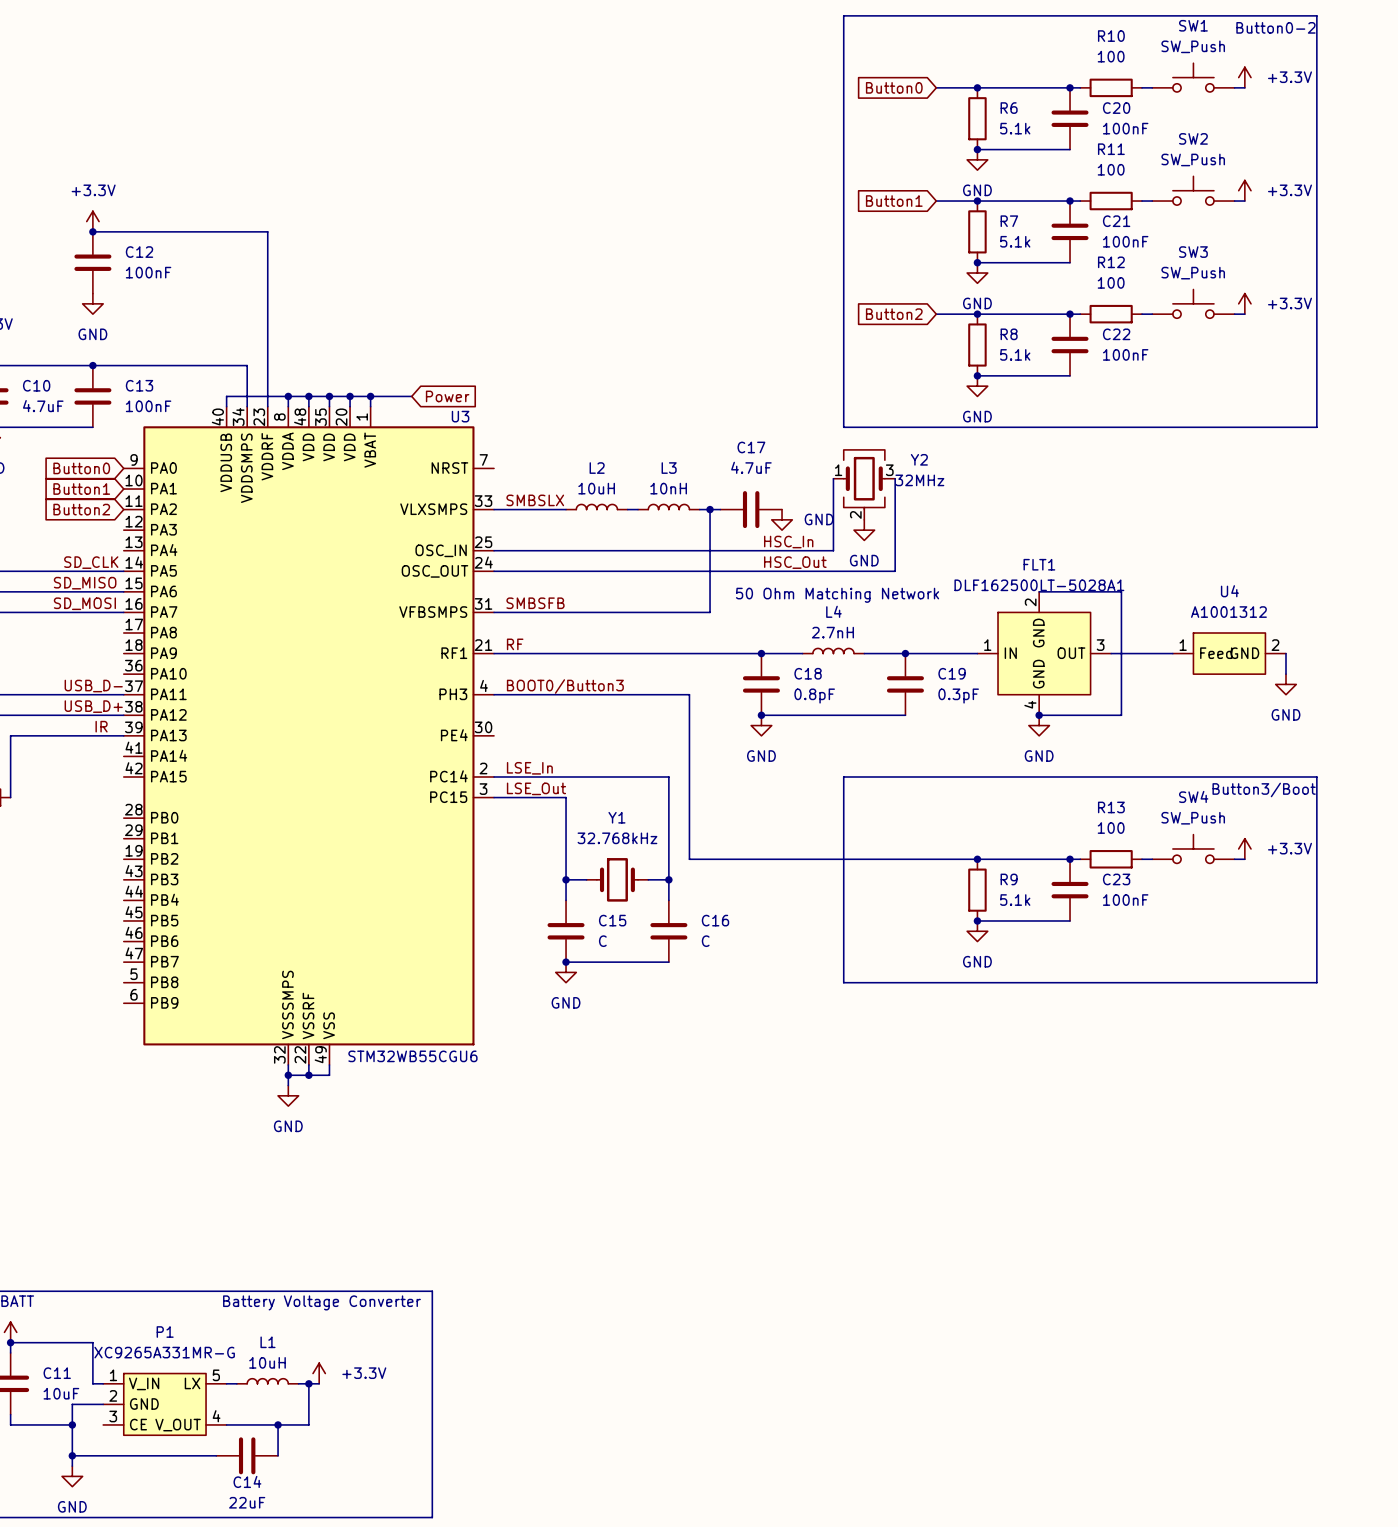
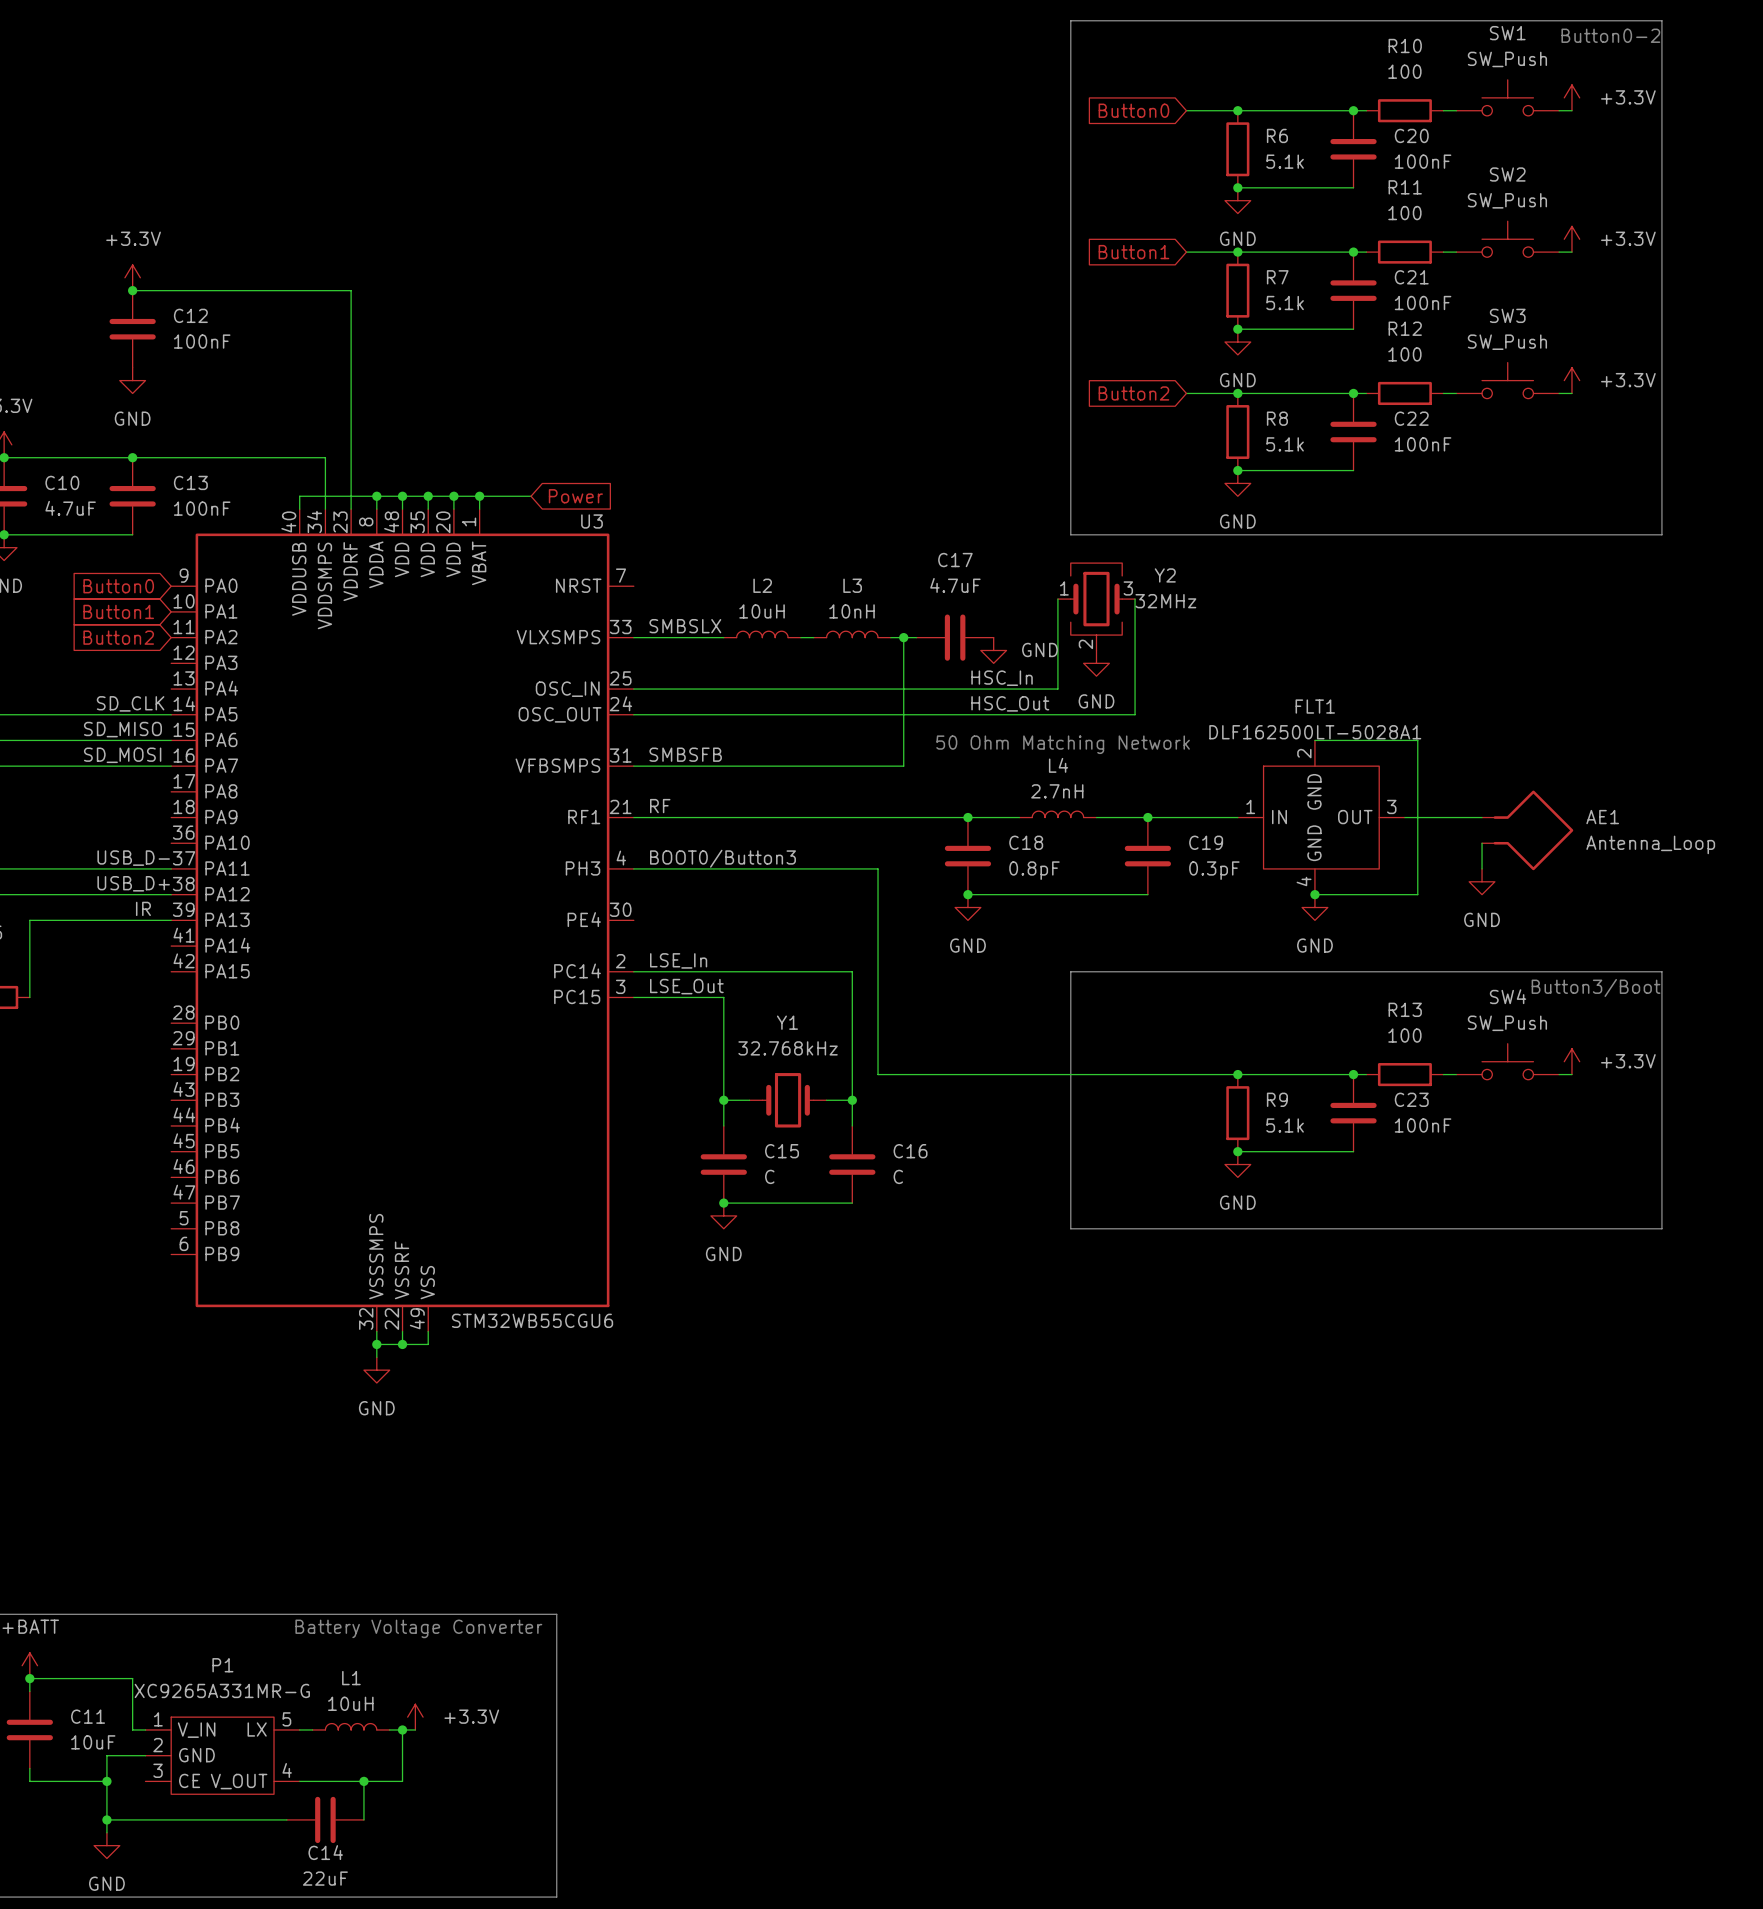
U4: A1001312 (1229, 653) -> none
wire: (1286, 653) (1286, 674) -> (1482, 843) (1482, 868)
AE1: none -> Antenna_Loop (1527, 830)
power symbol position: GND (1286, 684) -> GND (1482, 881)

